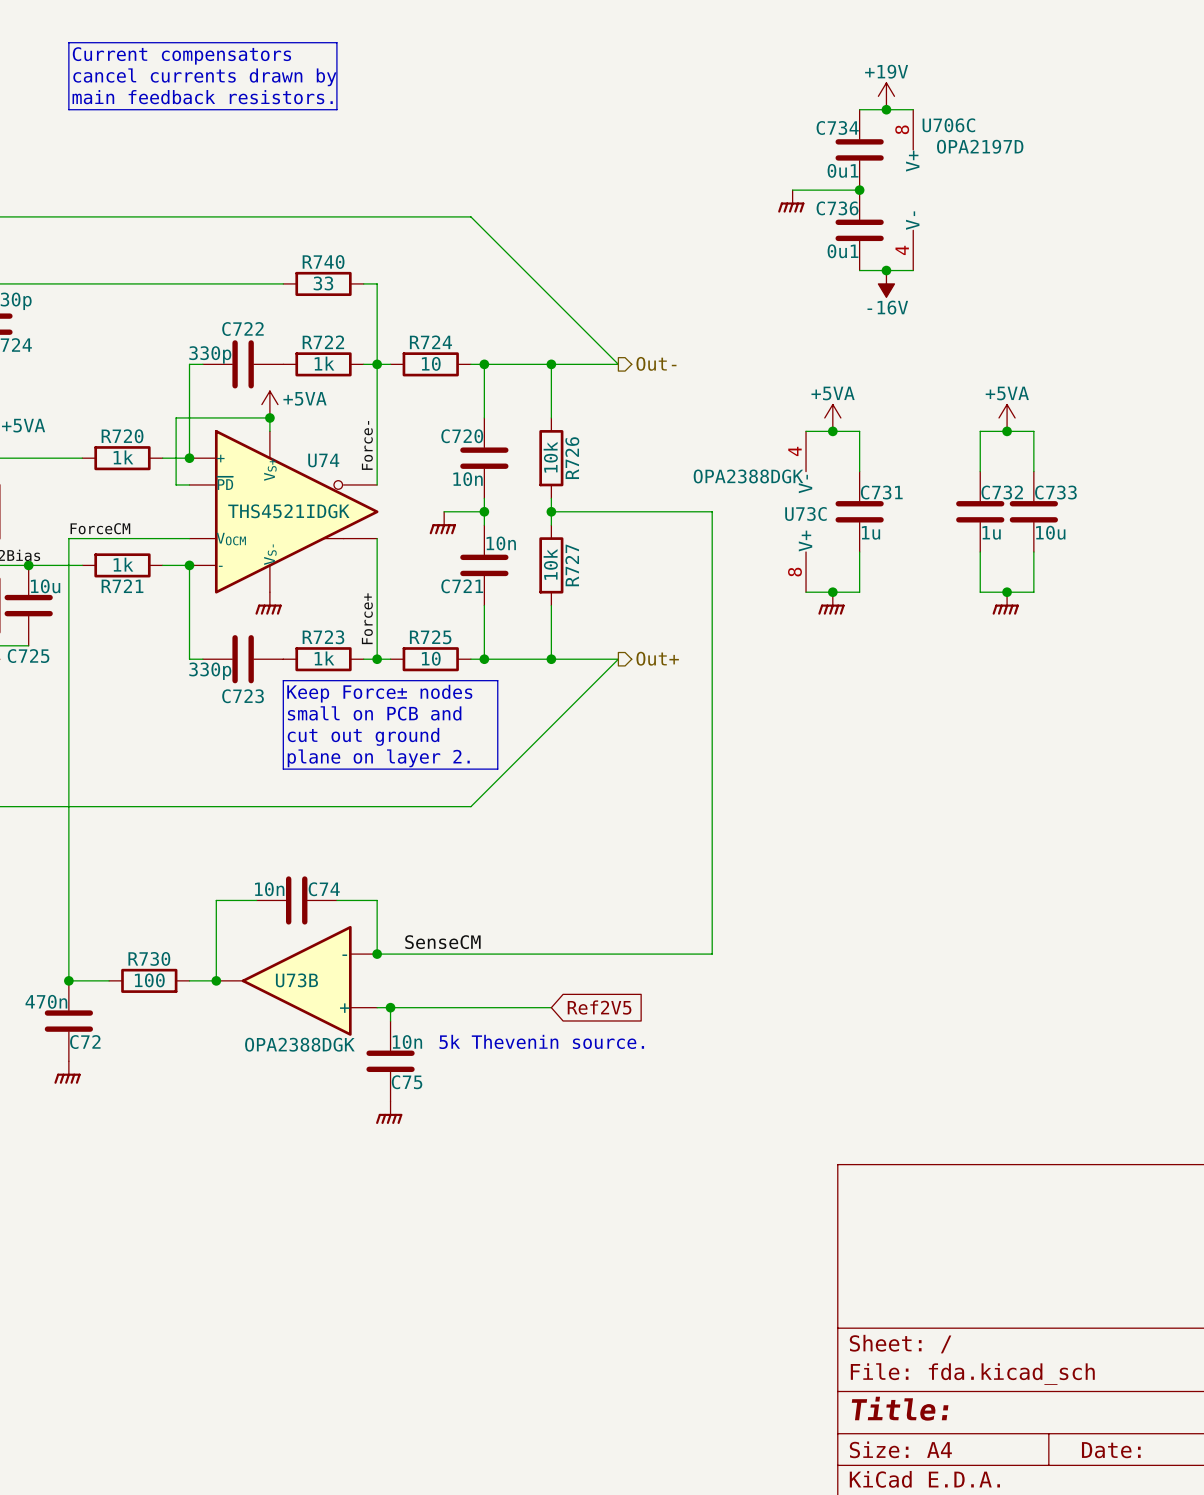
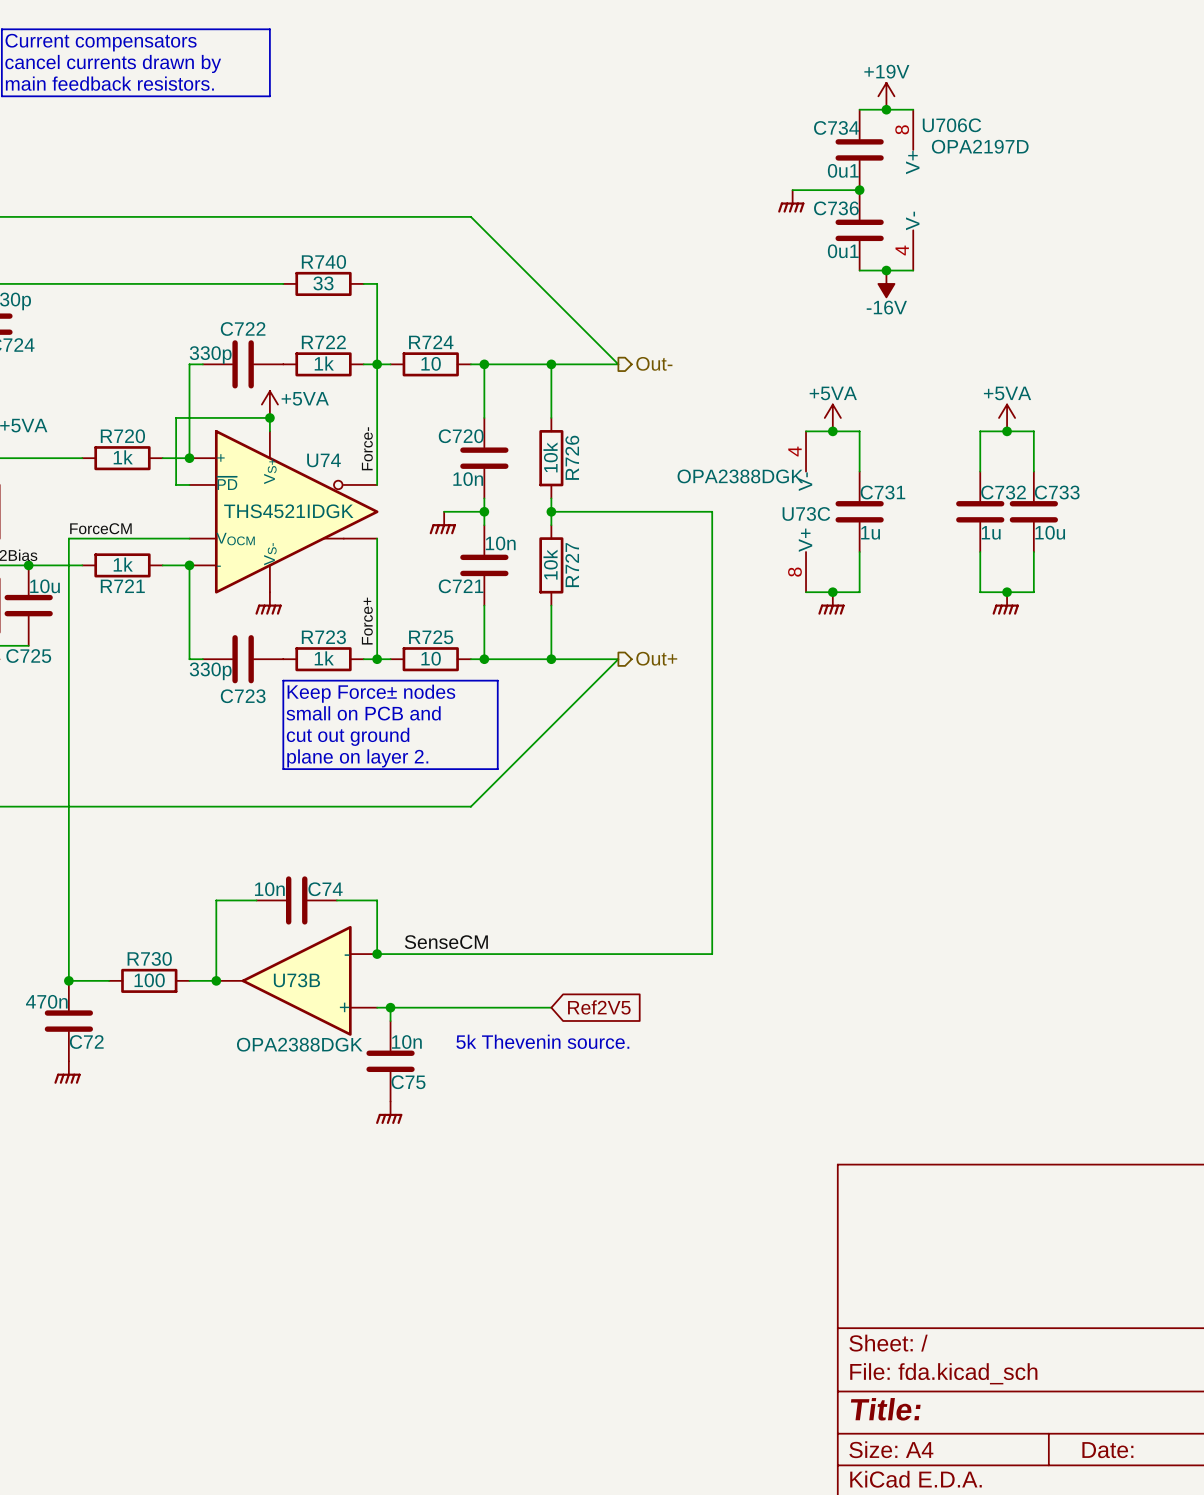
line: (68, 42) (336, 42) (336, 109) (68, 109) (68, 42) -> (1, 29) (269, 29) (269, 96) (1, 96) (1, 29)
text position: Current compensators (181, 55) -> Current compensators (101, 42)
text position: cancel currents drawn by (204, 77) -> cancel currents drawn by (113, 63)
text position: main feedback resistors. (202, 97) -> main feedback resistors. (109, 83)

